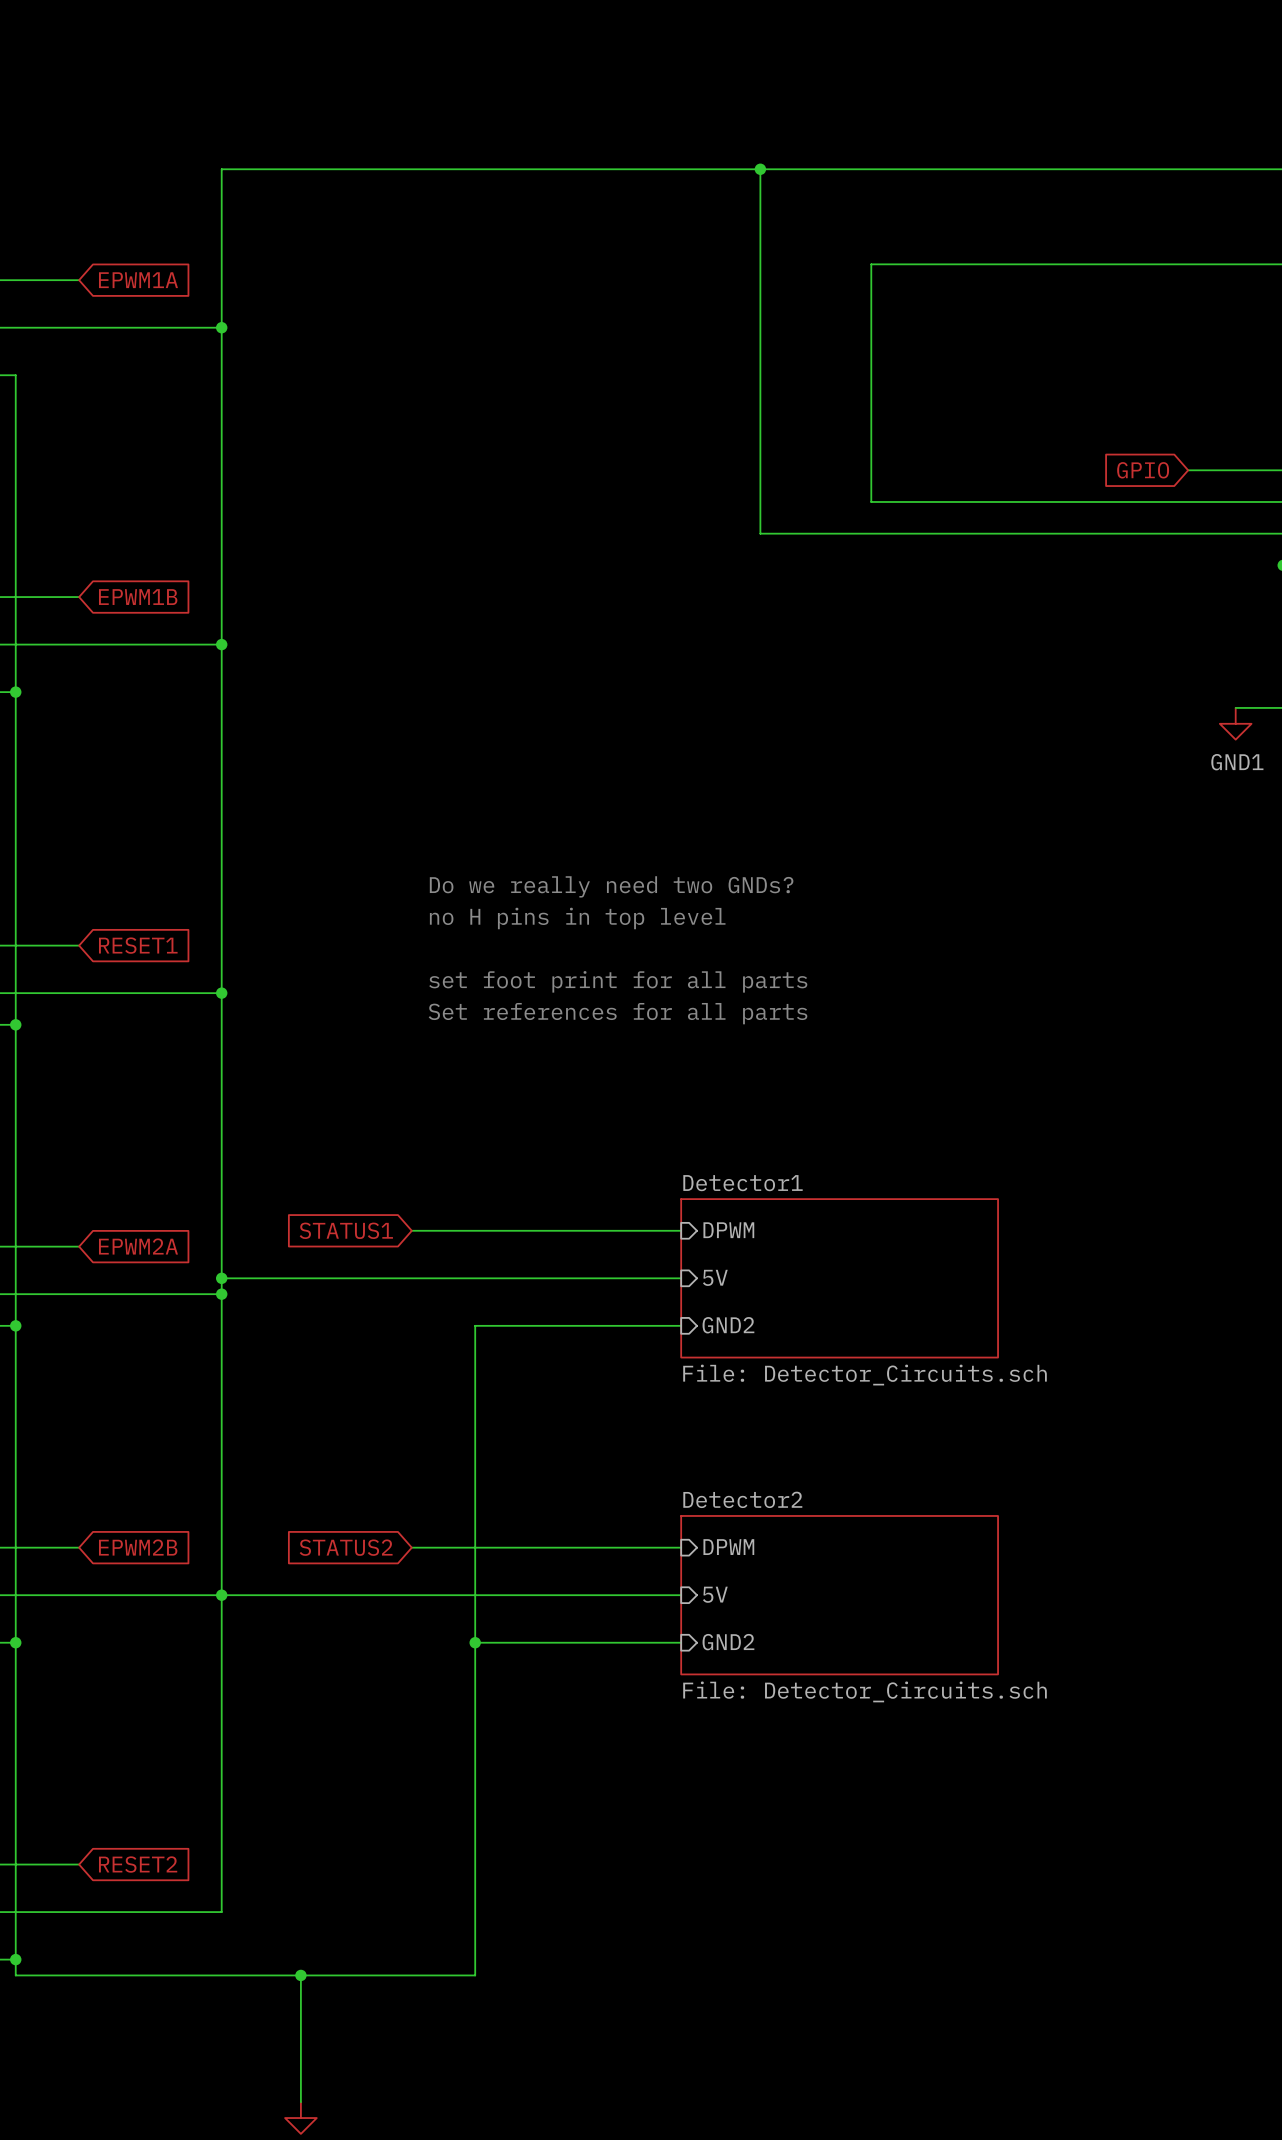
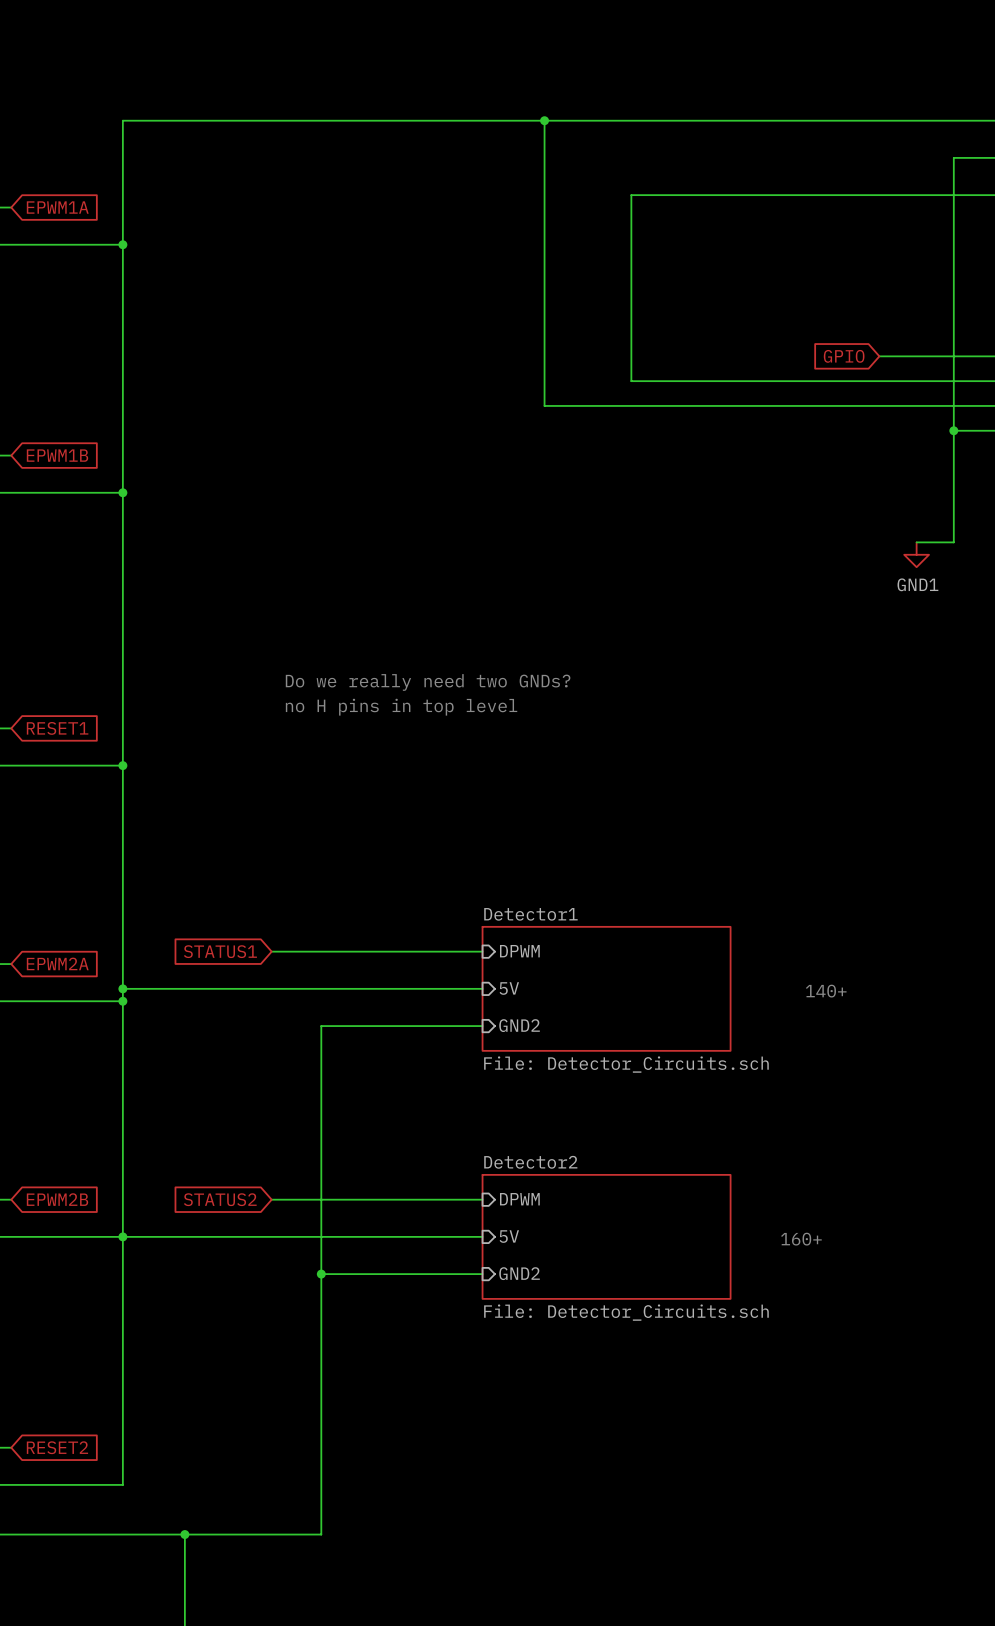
text: set foot print for all parts (618, 981) -> none
text: Set references for all parts (618, 1013) -> none
text: none -> 140+ (826, 991)
text: none -> 160+ (801, 1239)

